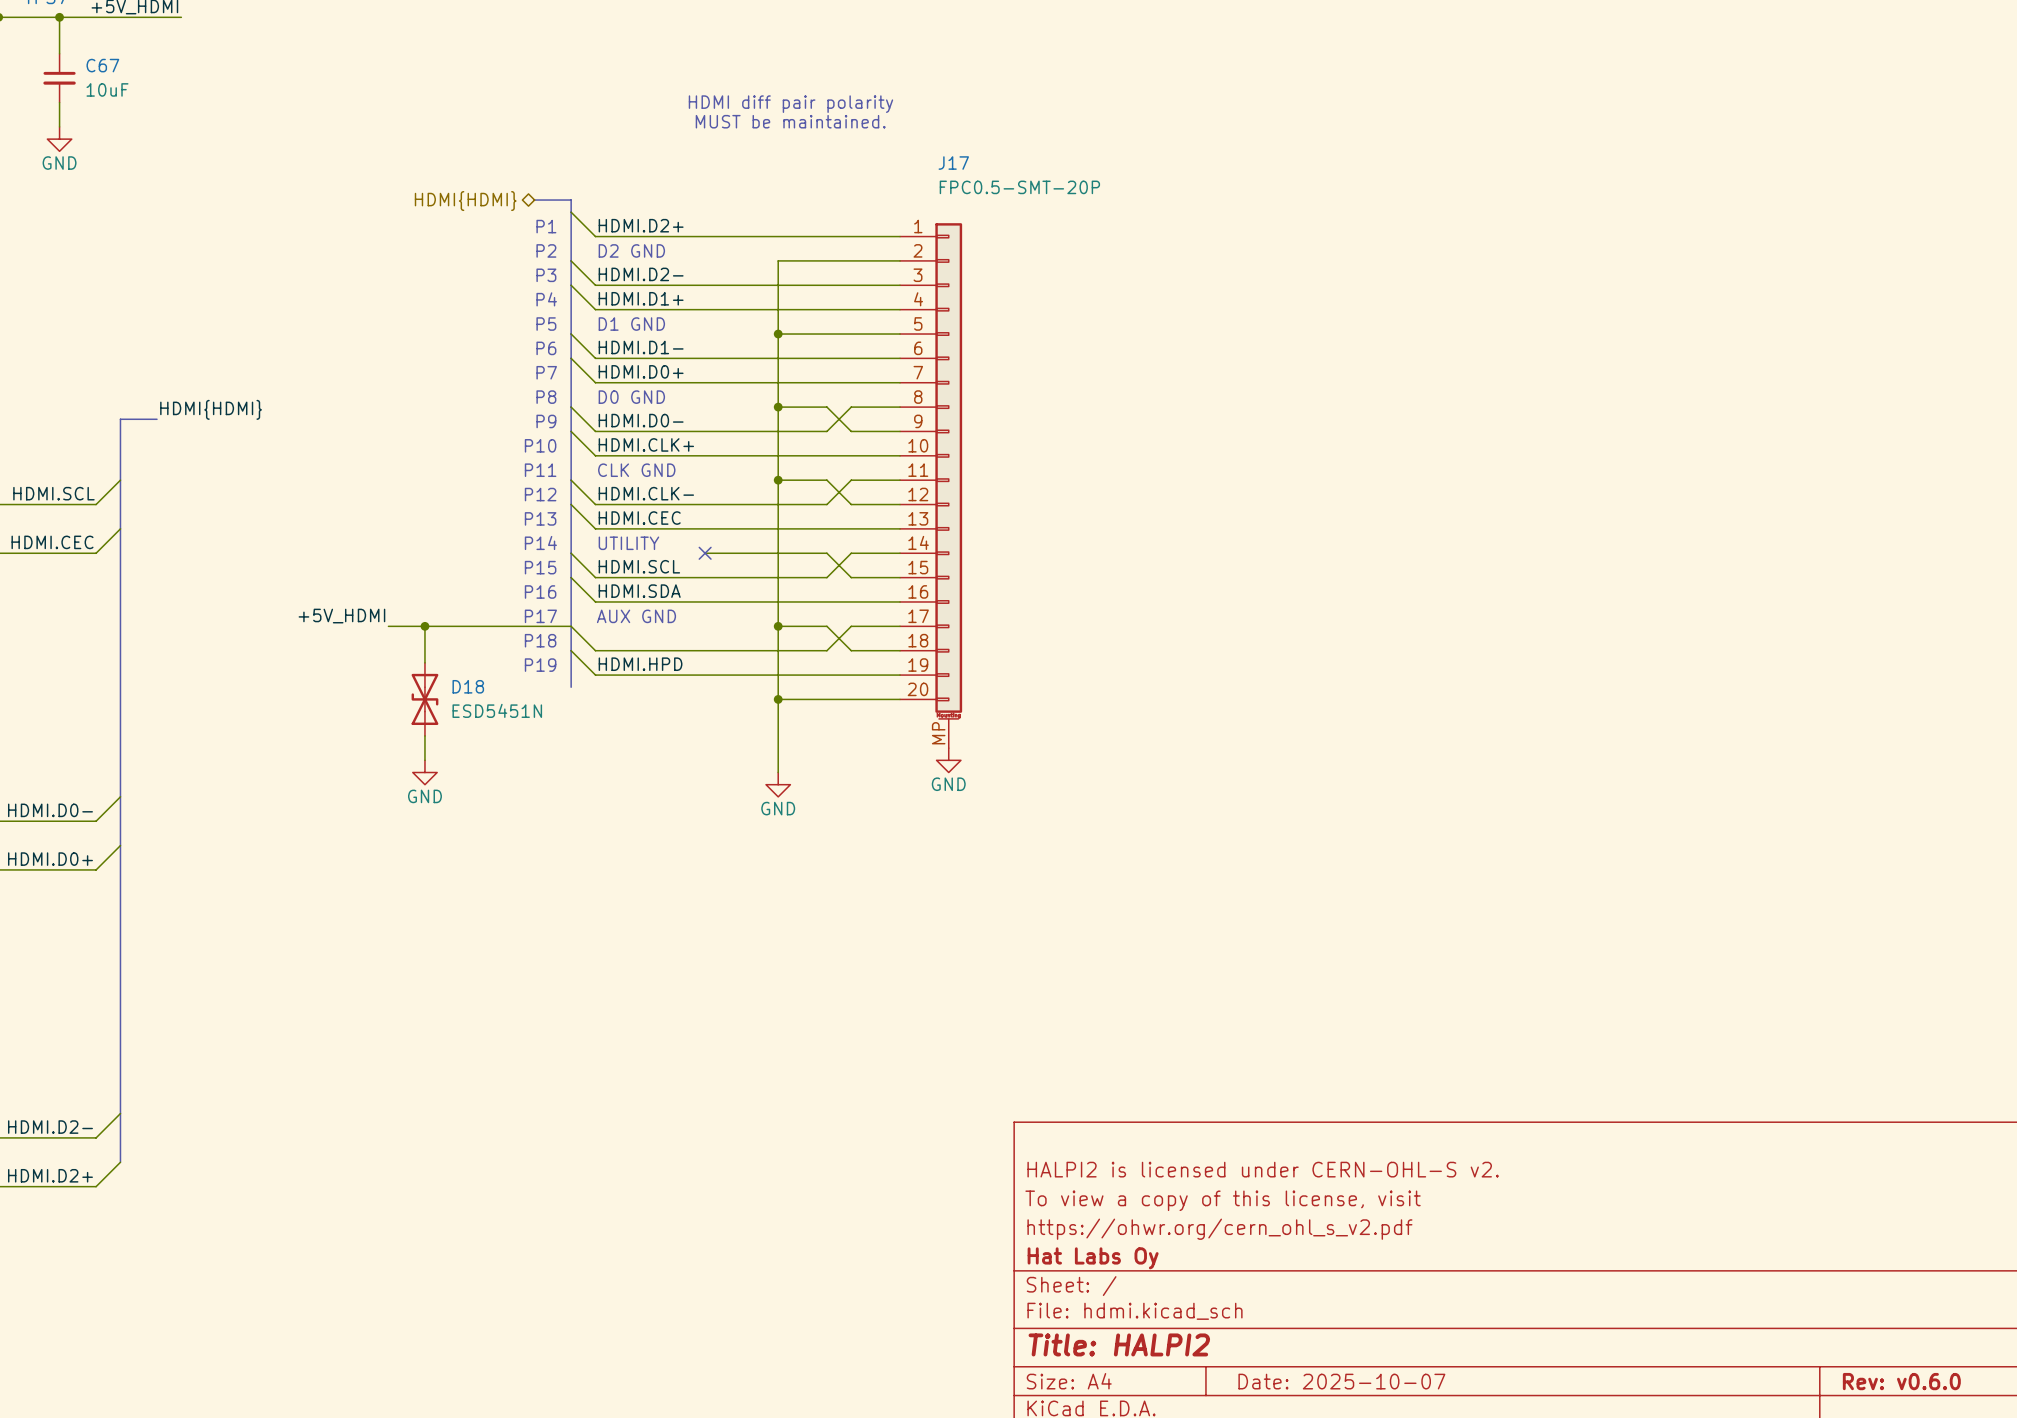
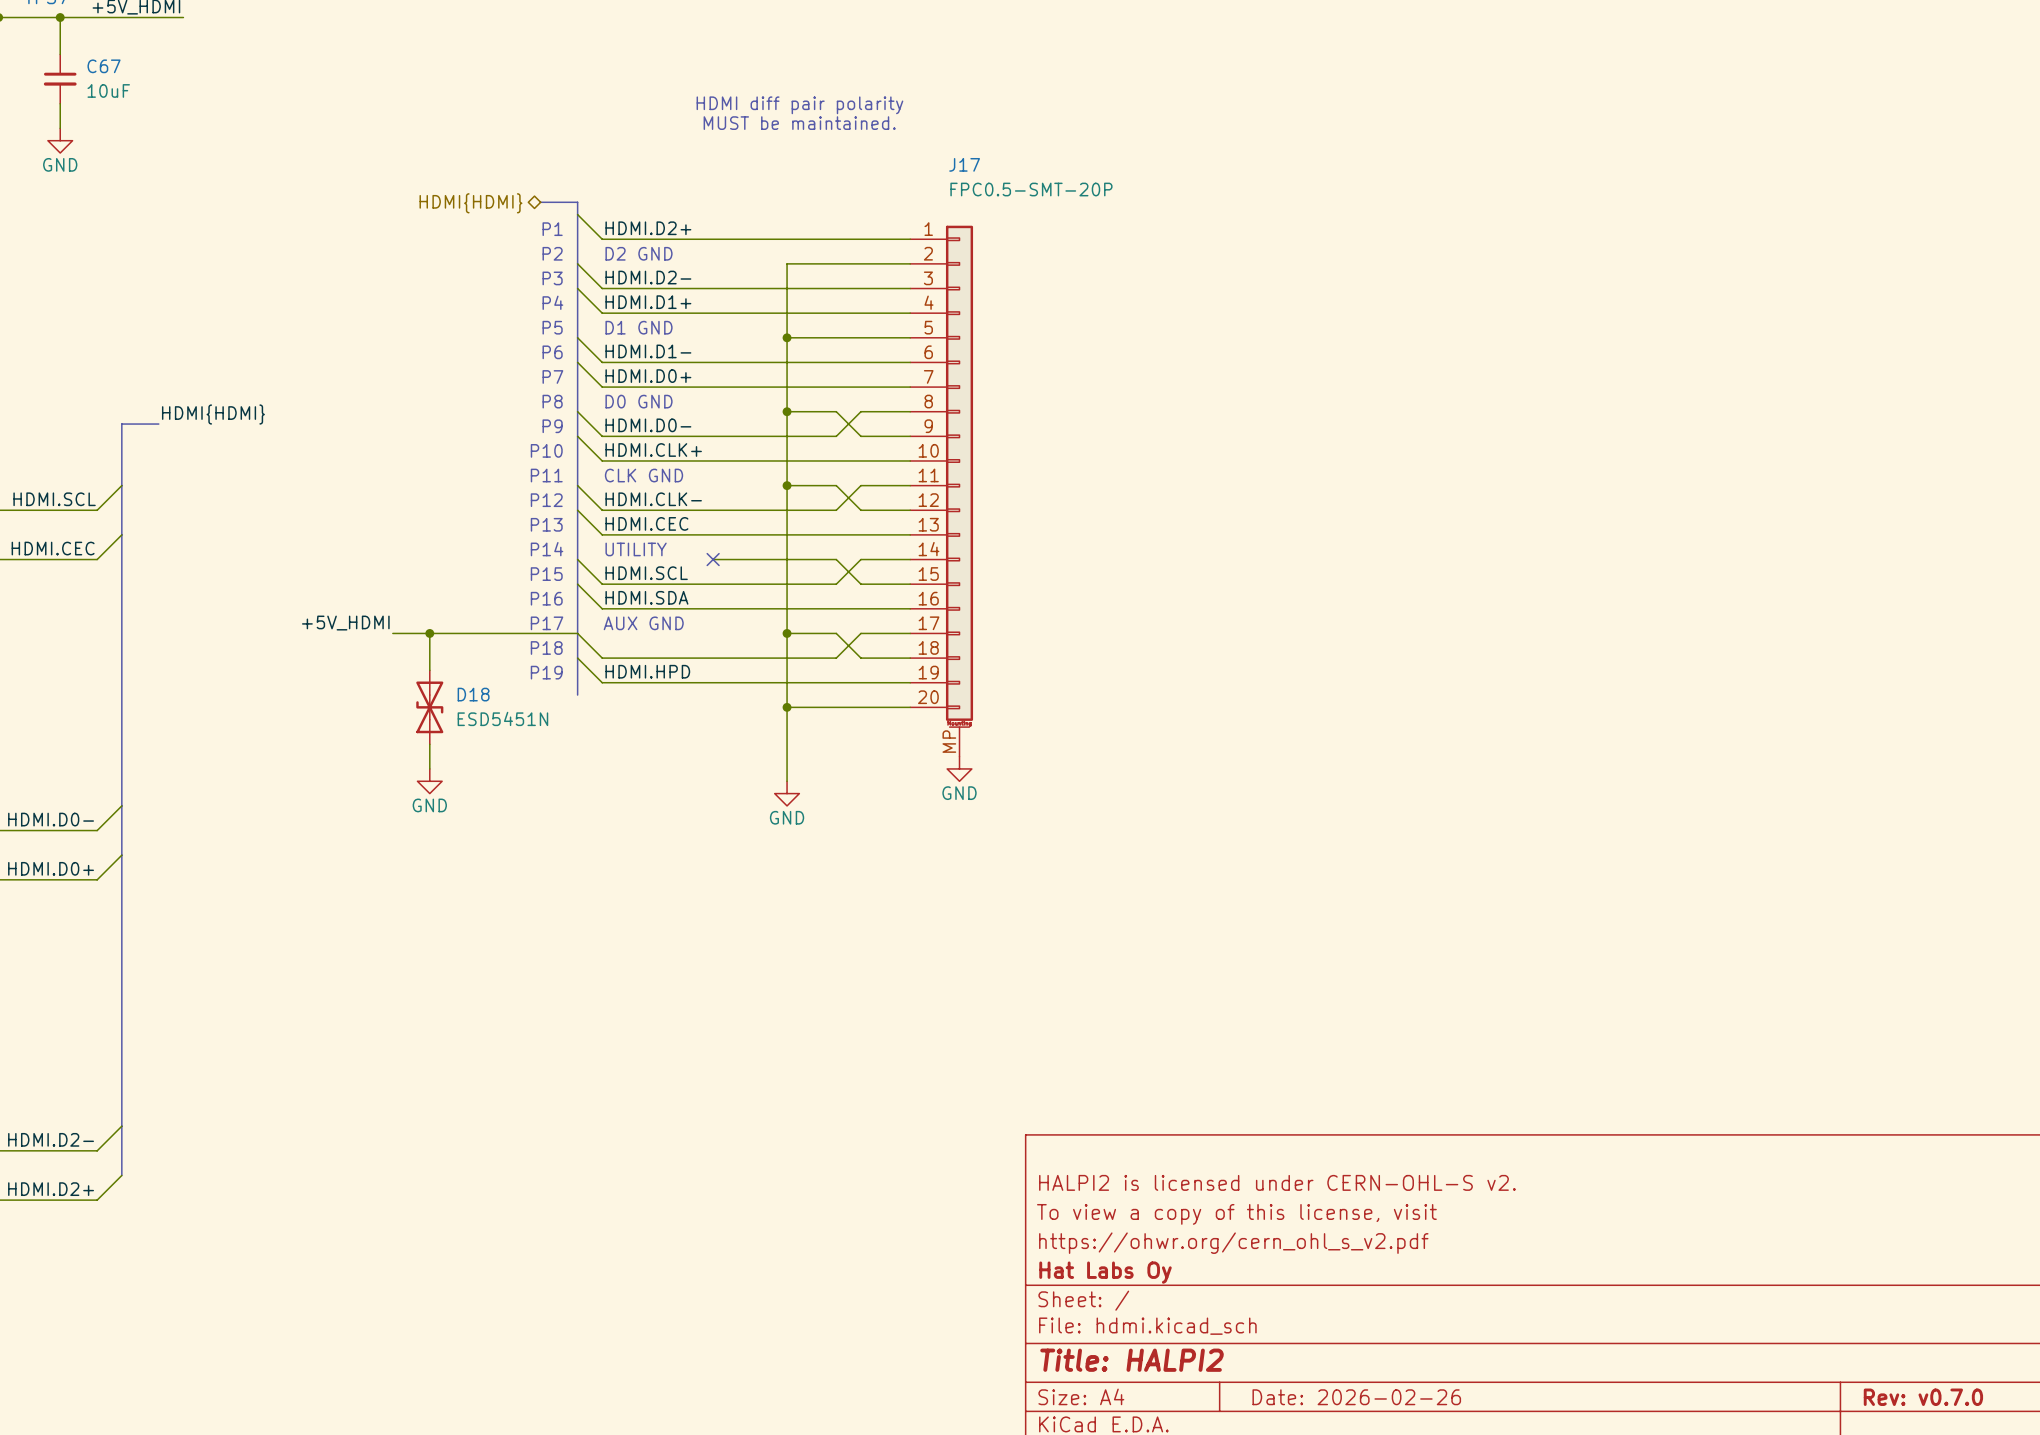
title block: Date: 2025-10-07 (1341, 1381) -> Date: 2026-02-26 (1356, 1397)
title block: Rev: v0.6.0 (1901, 1381) -> Rev: v0.7.0 (1923, 1397)

